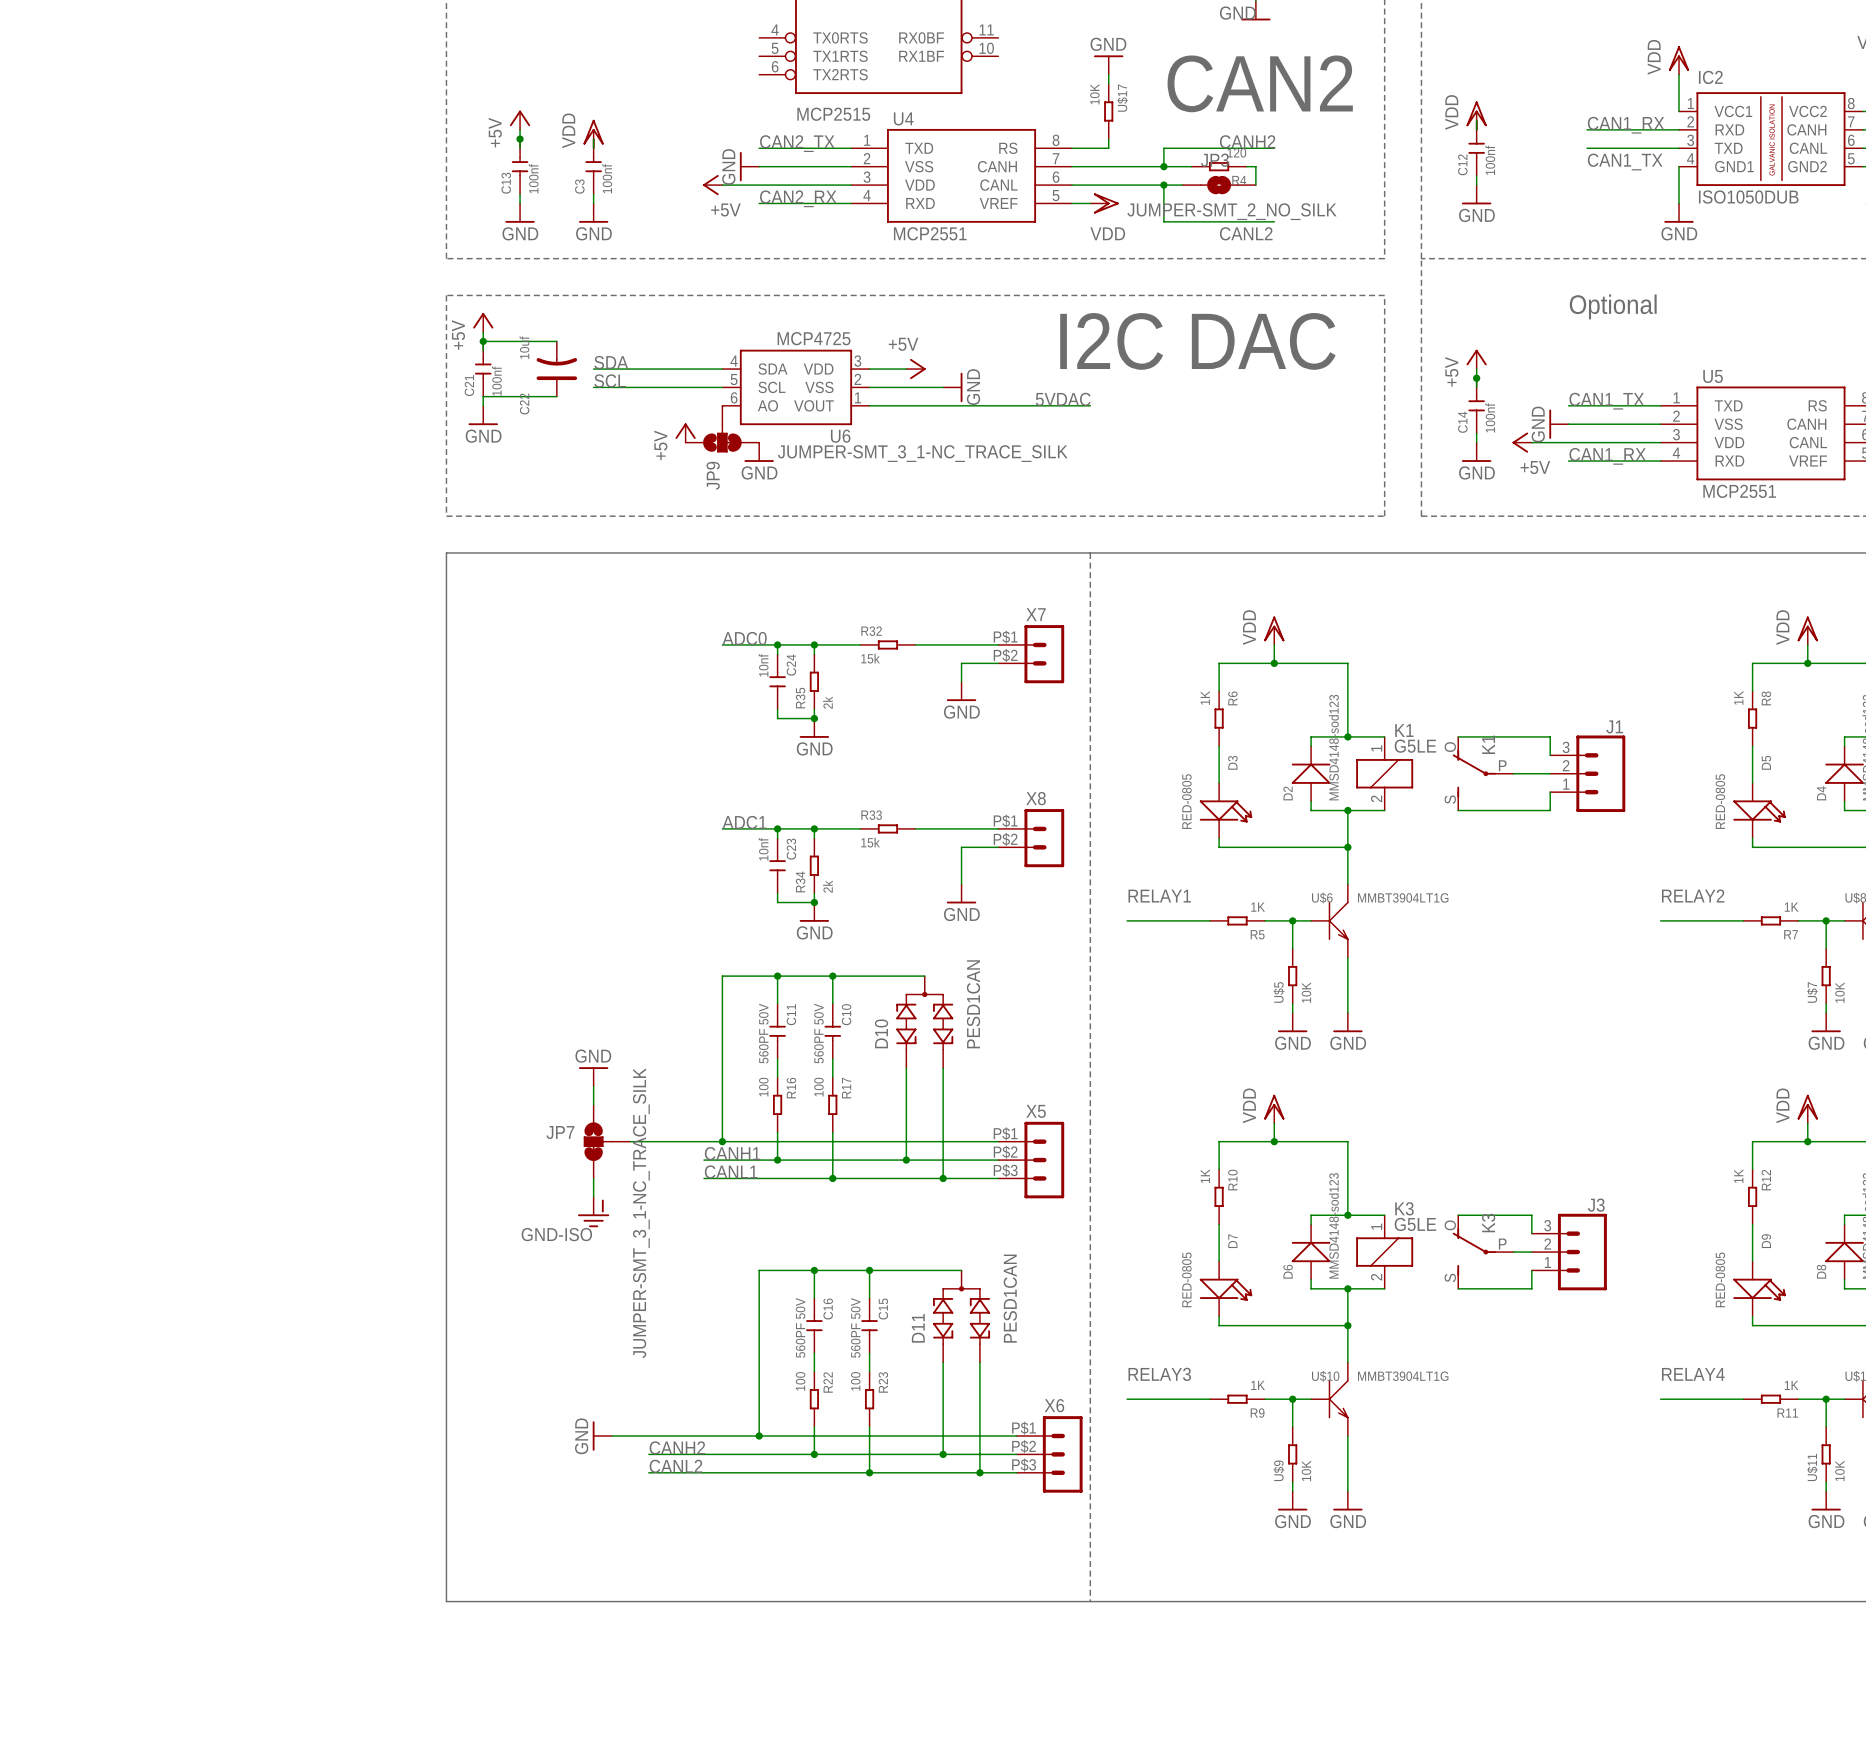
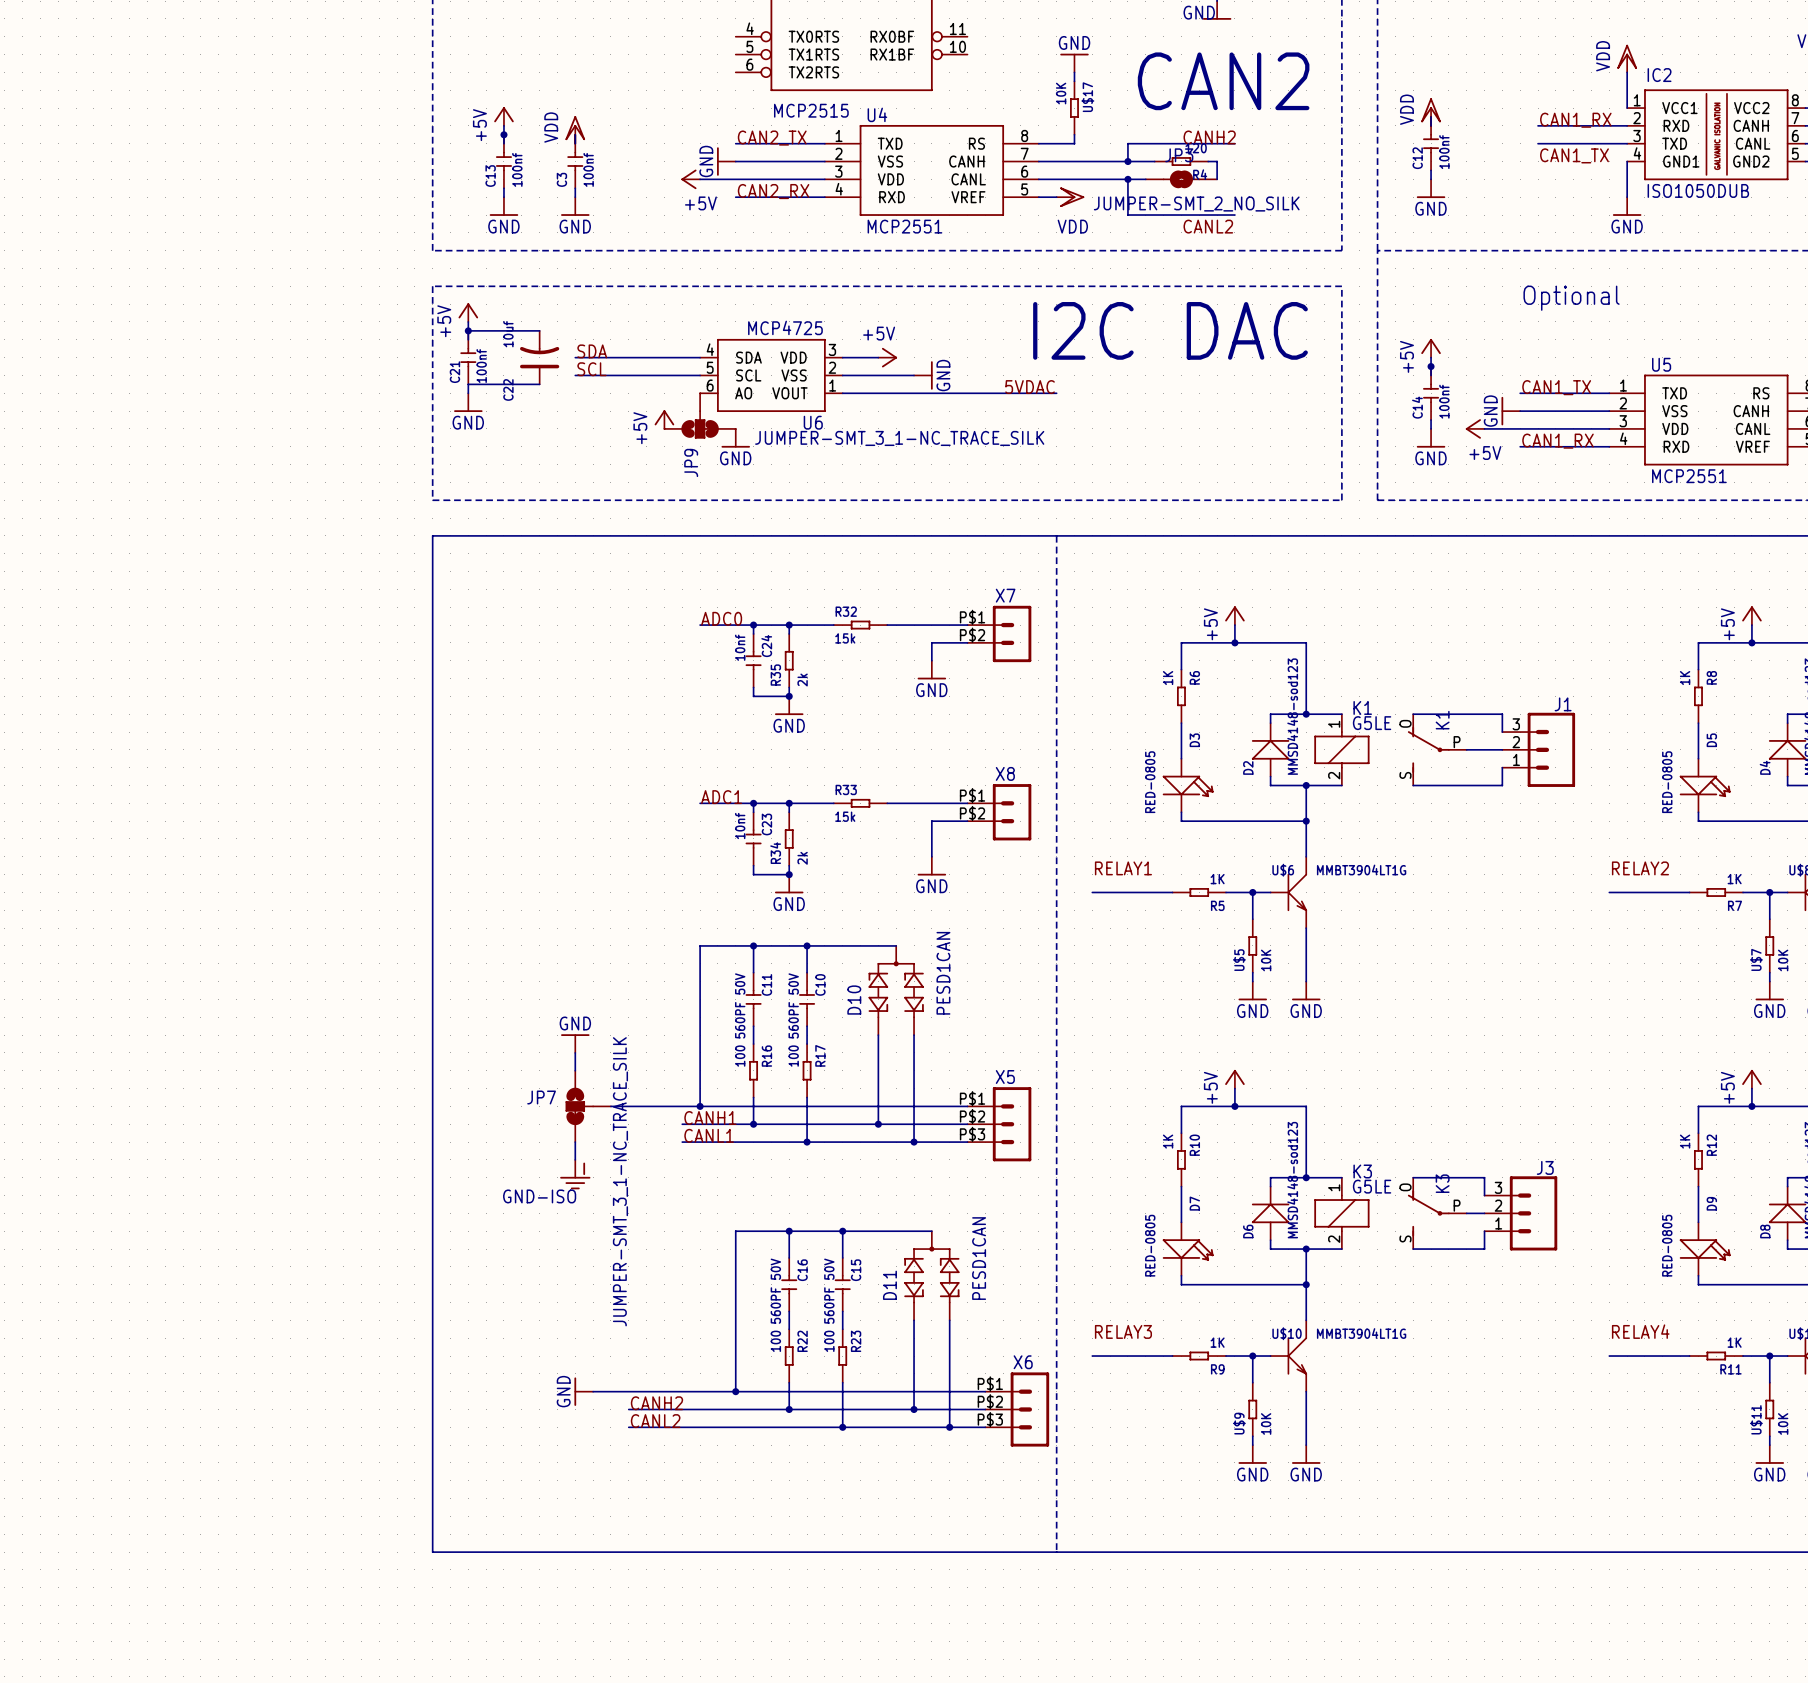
power symbol: VDD (1274, 630) -> +5V (1234, 615)
power symbol: VDD (1807, 630) -> +5V (1751, 615)
power symbol: VDD (1274, 1109) -> +5V (1234, 1079)
power symbol: VDD (1807, 1109) -> +5V (1751, 1079)

